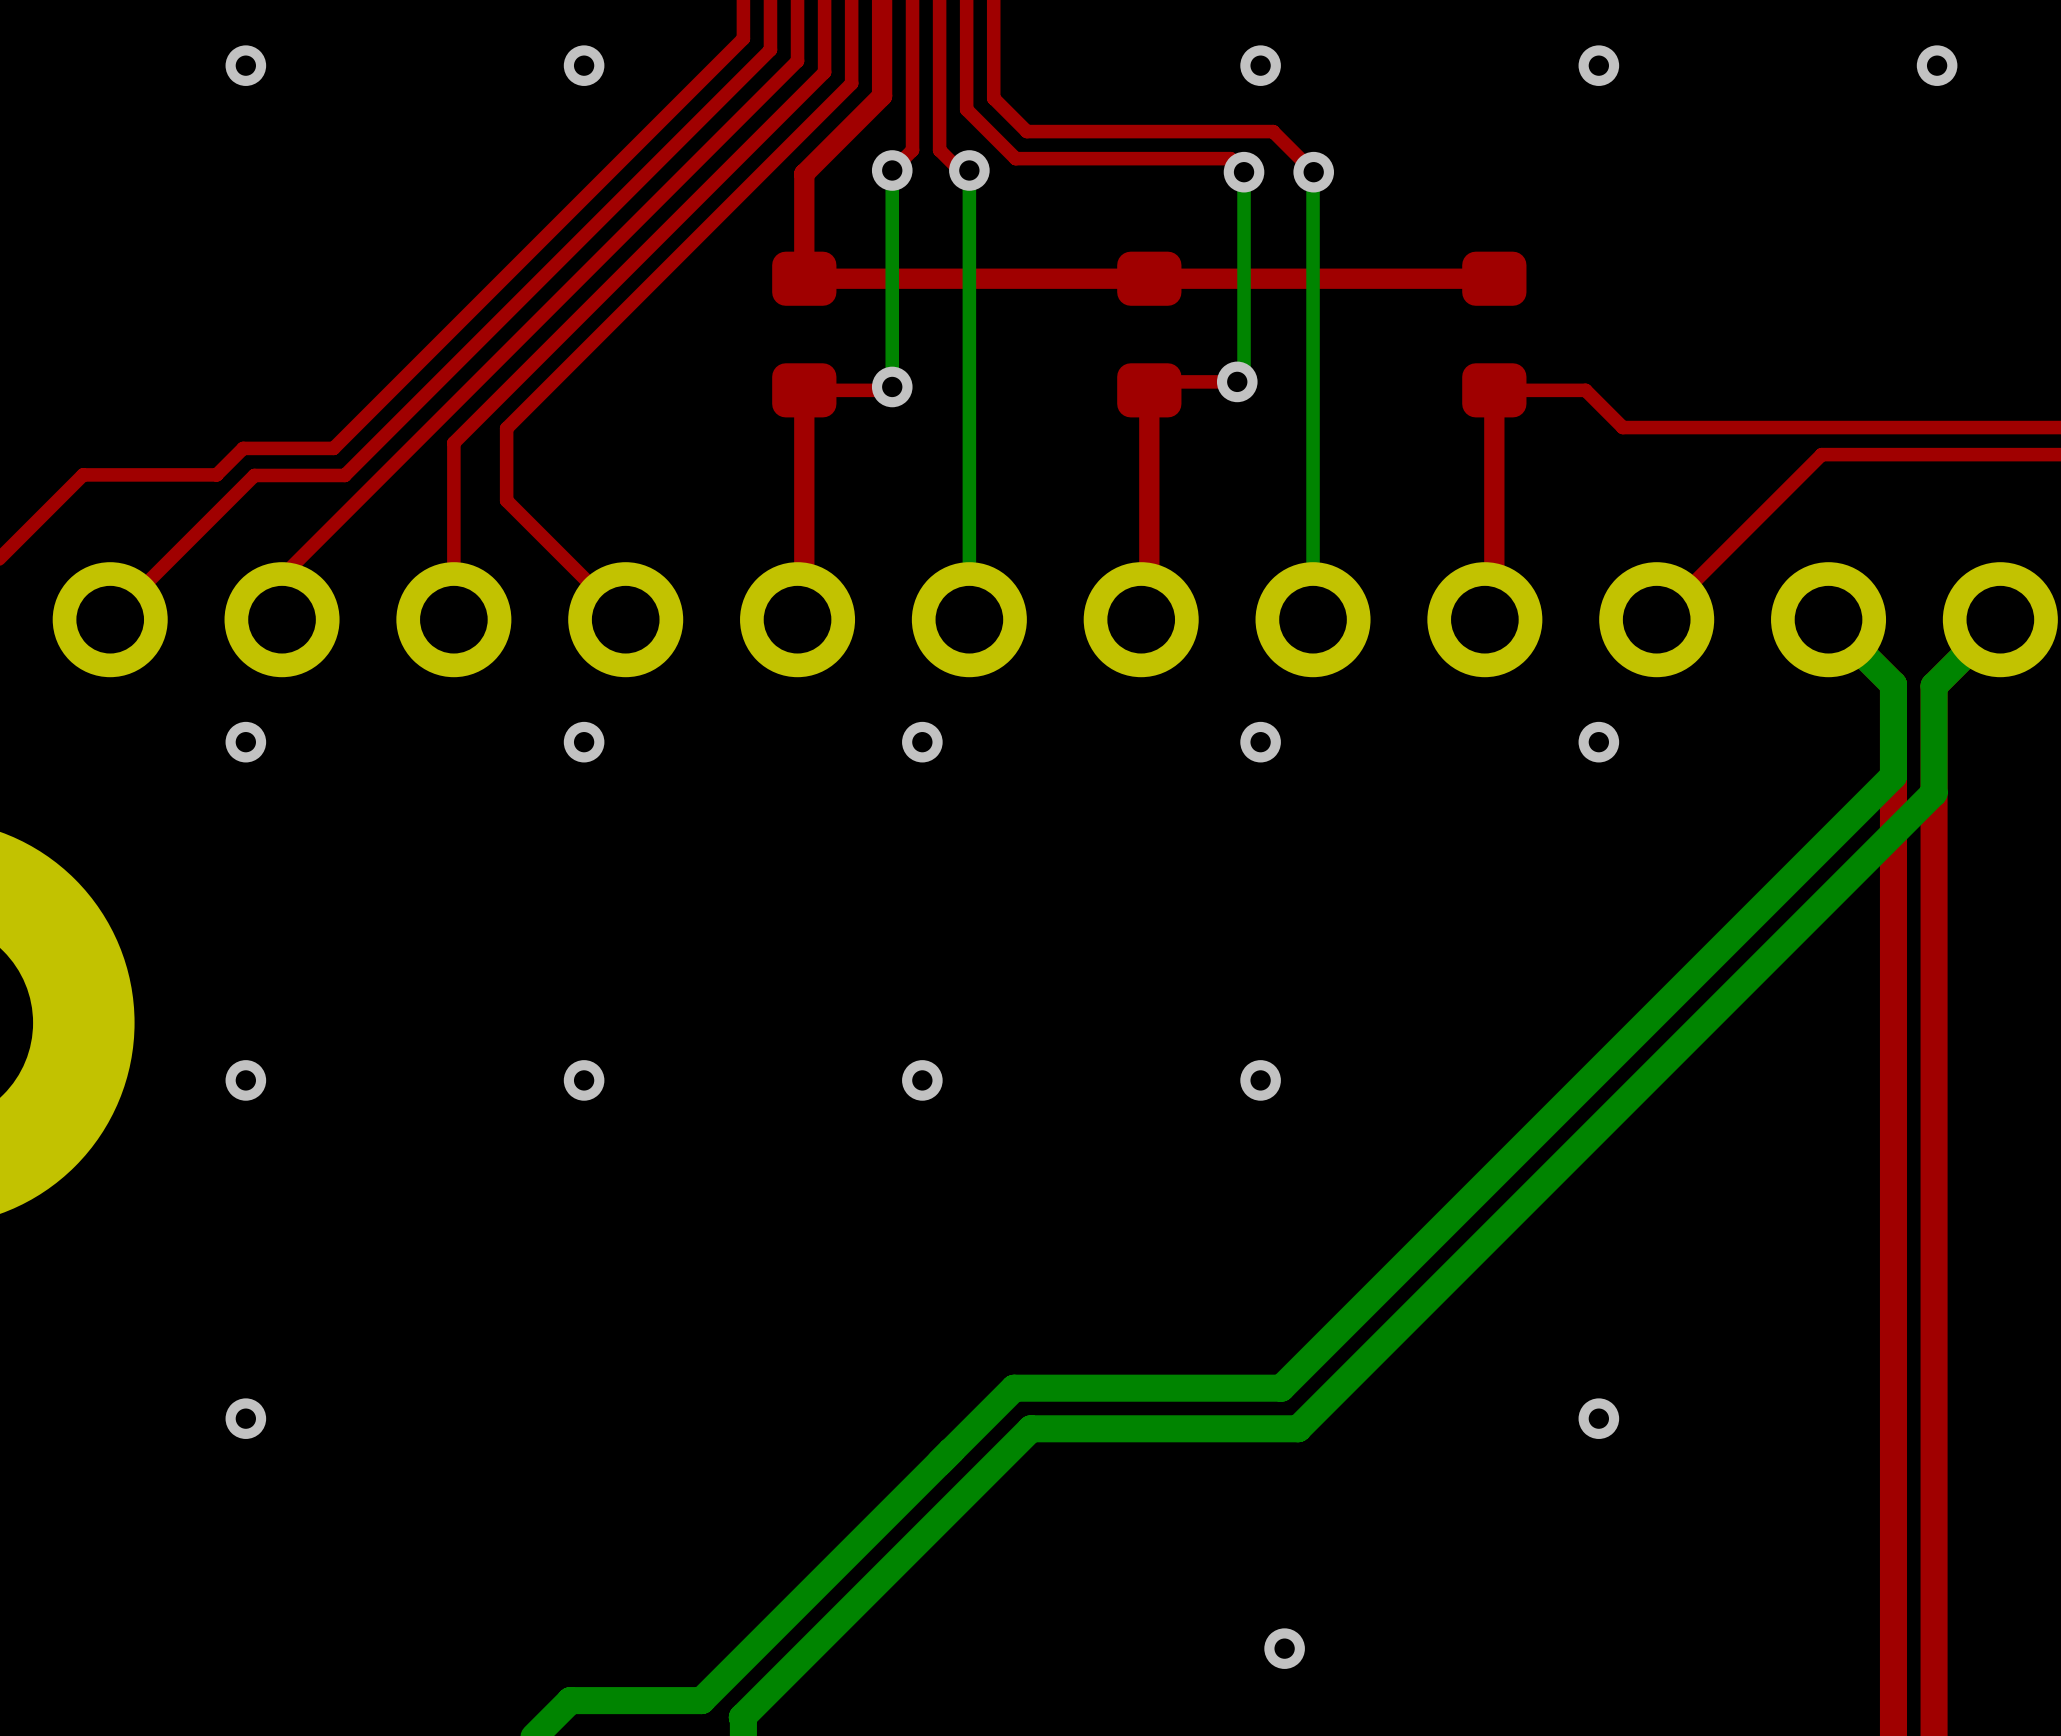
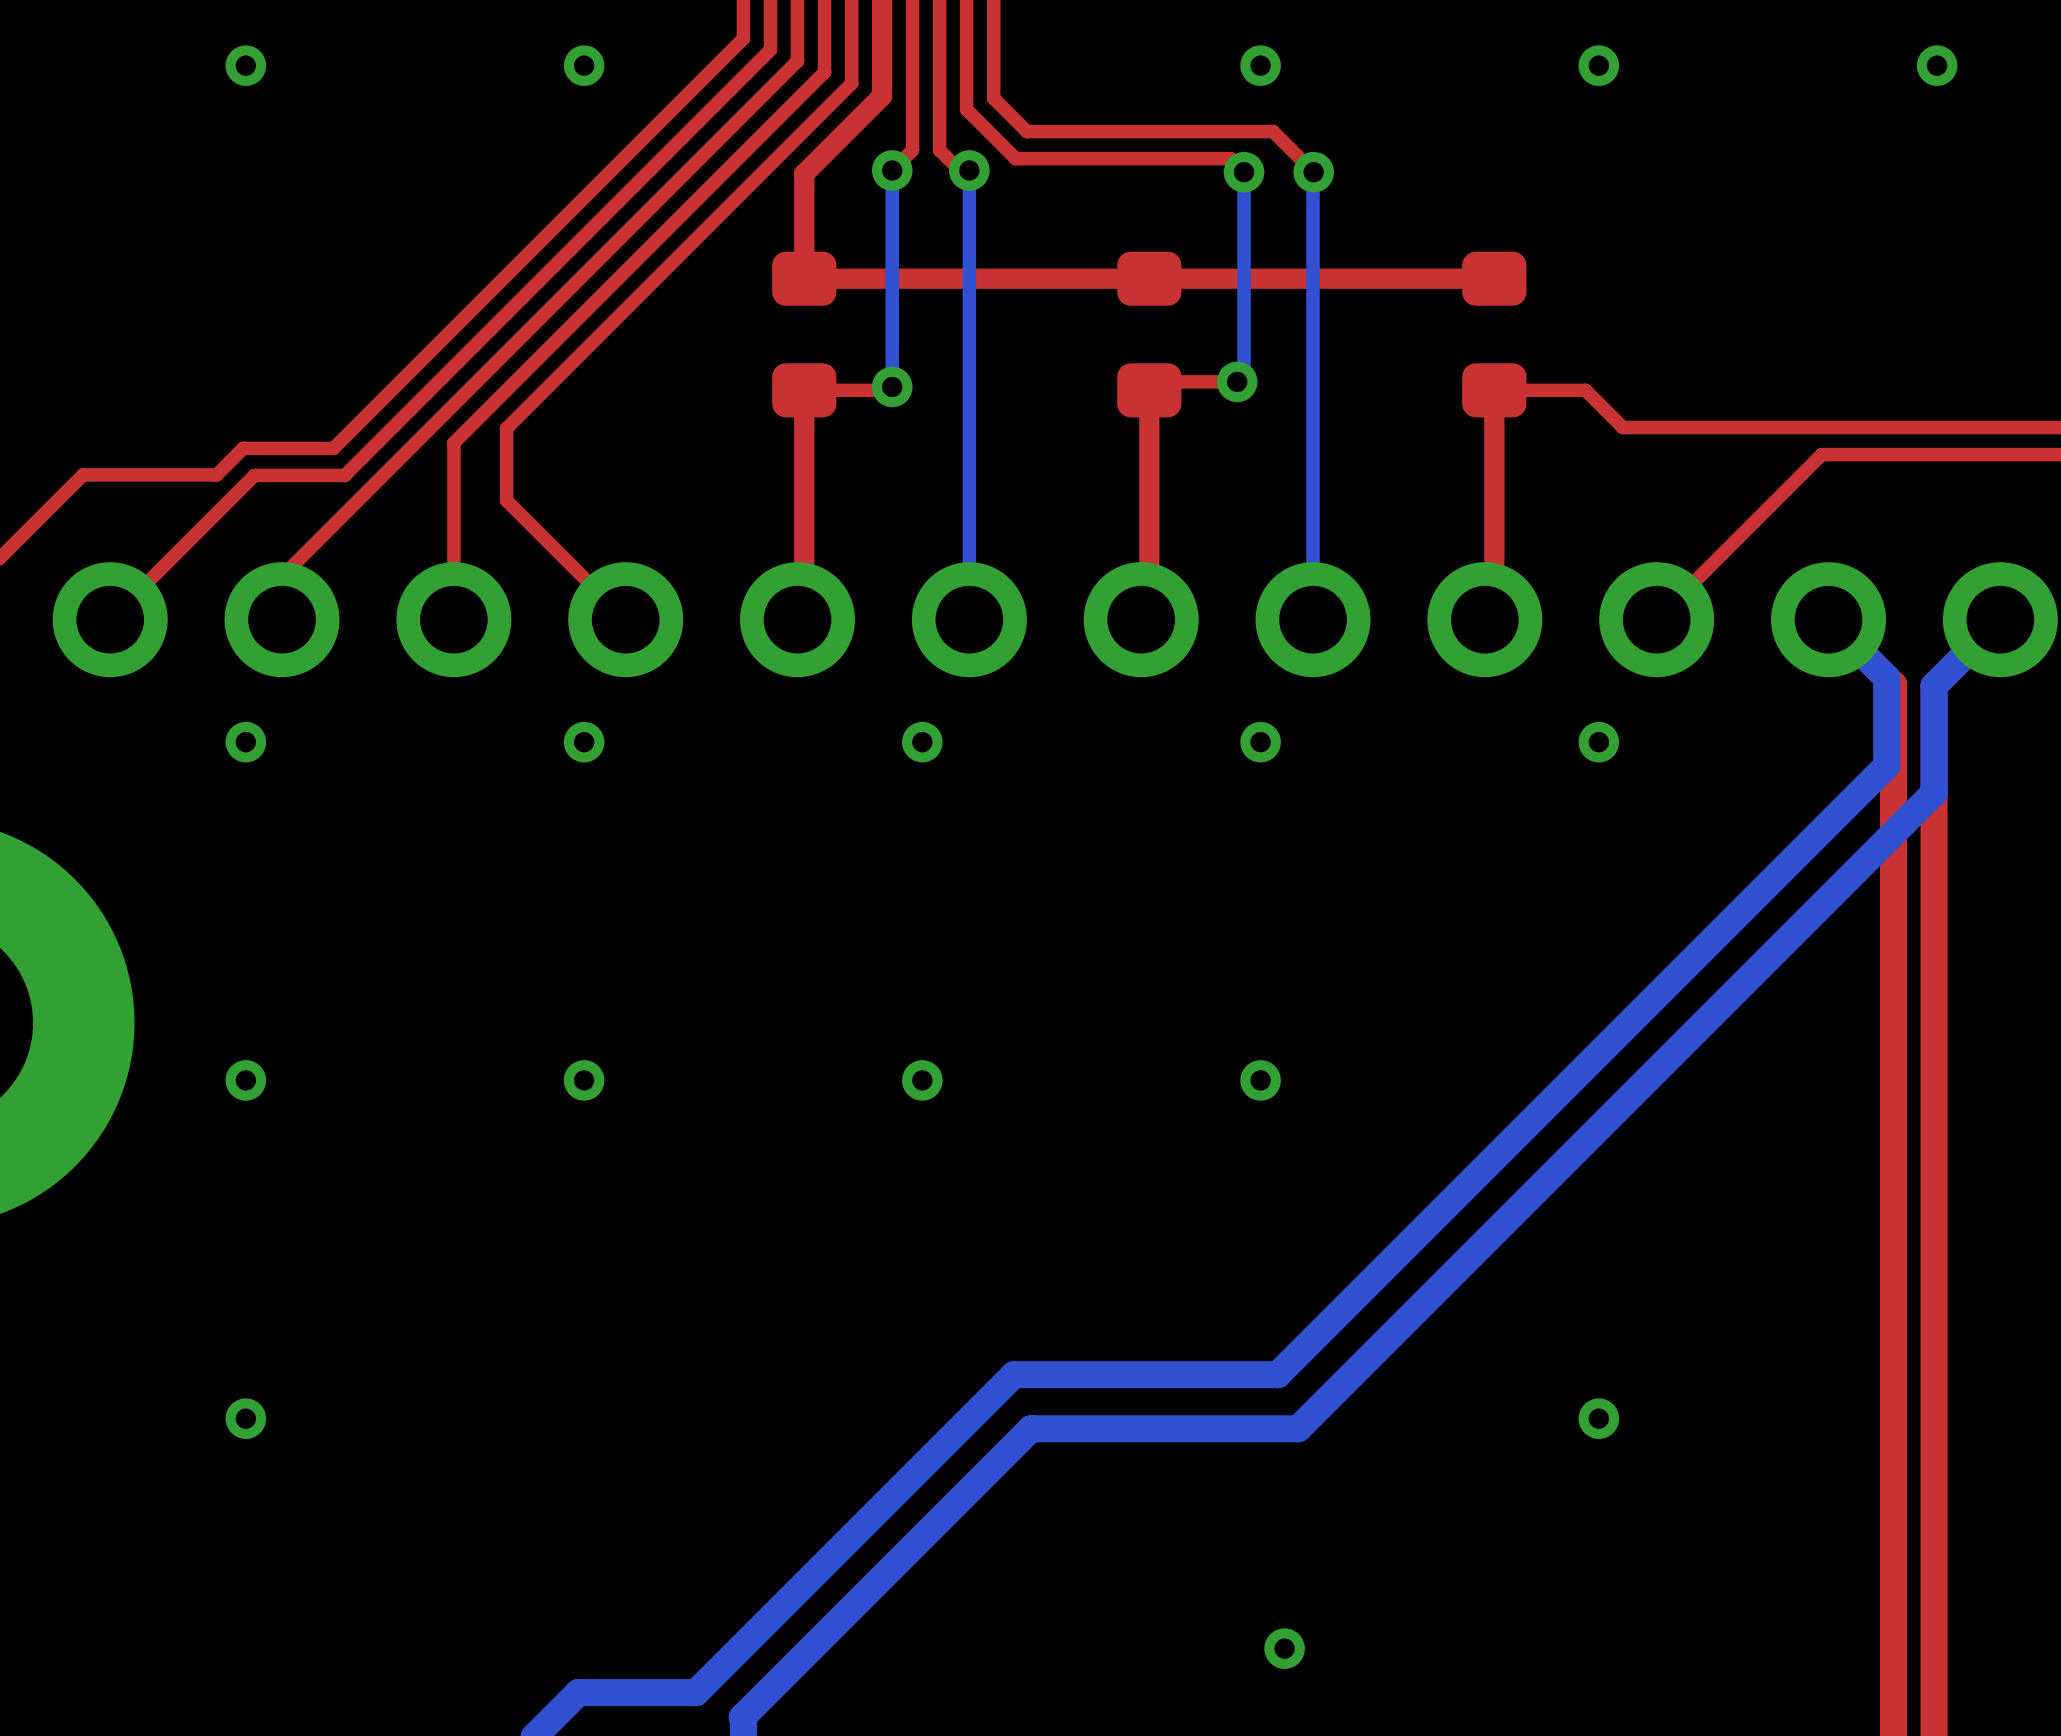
bottom track: (1886, 677) (1893, 684) (1893, 776) (1281, 1388) (1014, 1388) (701, 1700) (570, 1700) -> (1886, 677) (1886, 765) (1277, 1374) (1014, 1374) (696, 1692) (578, 1692) (570, 1700)

